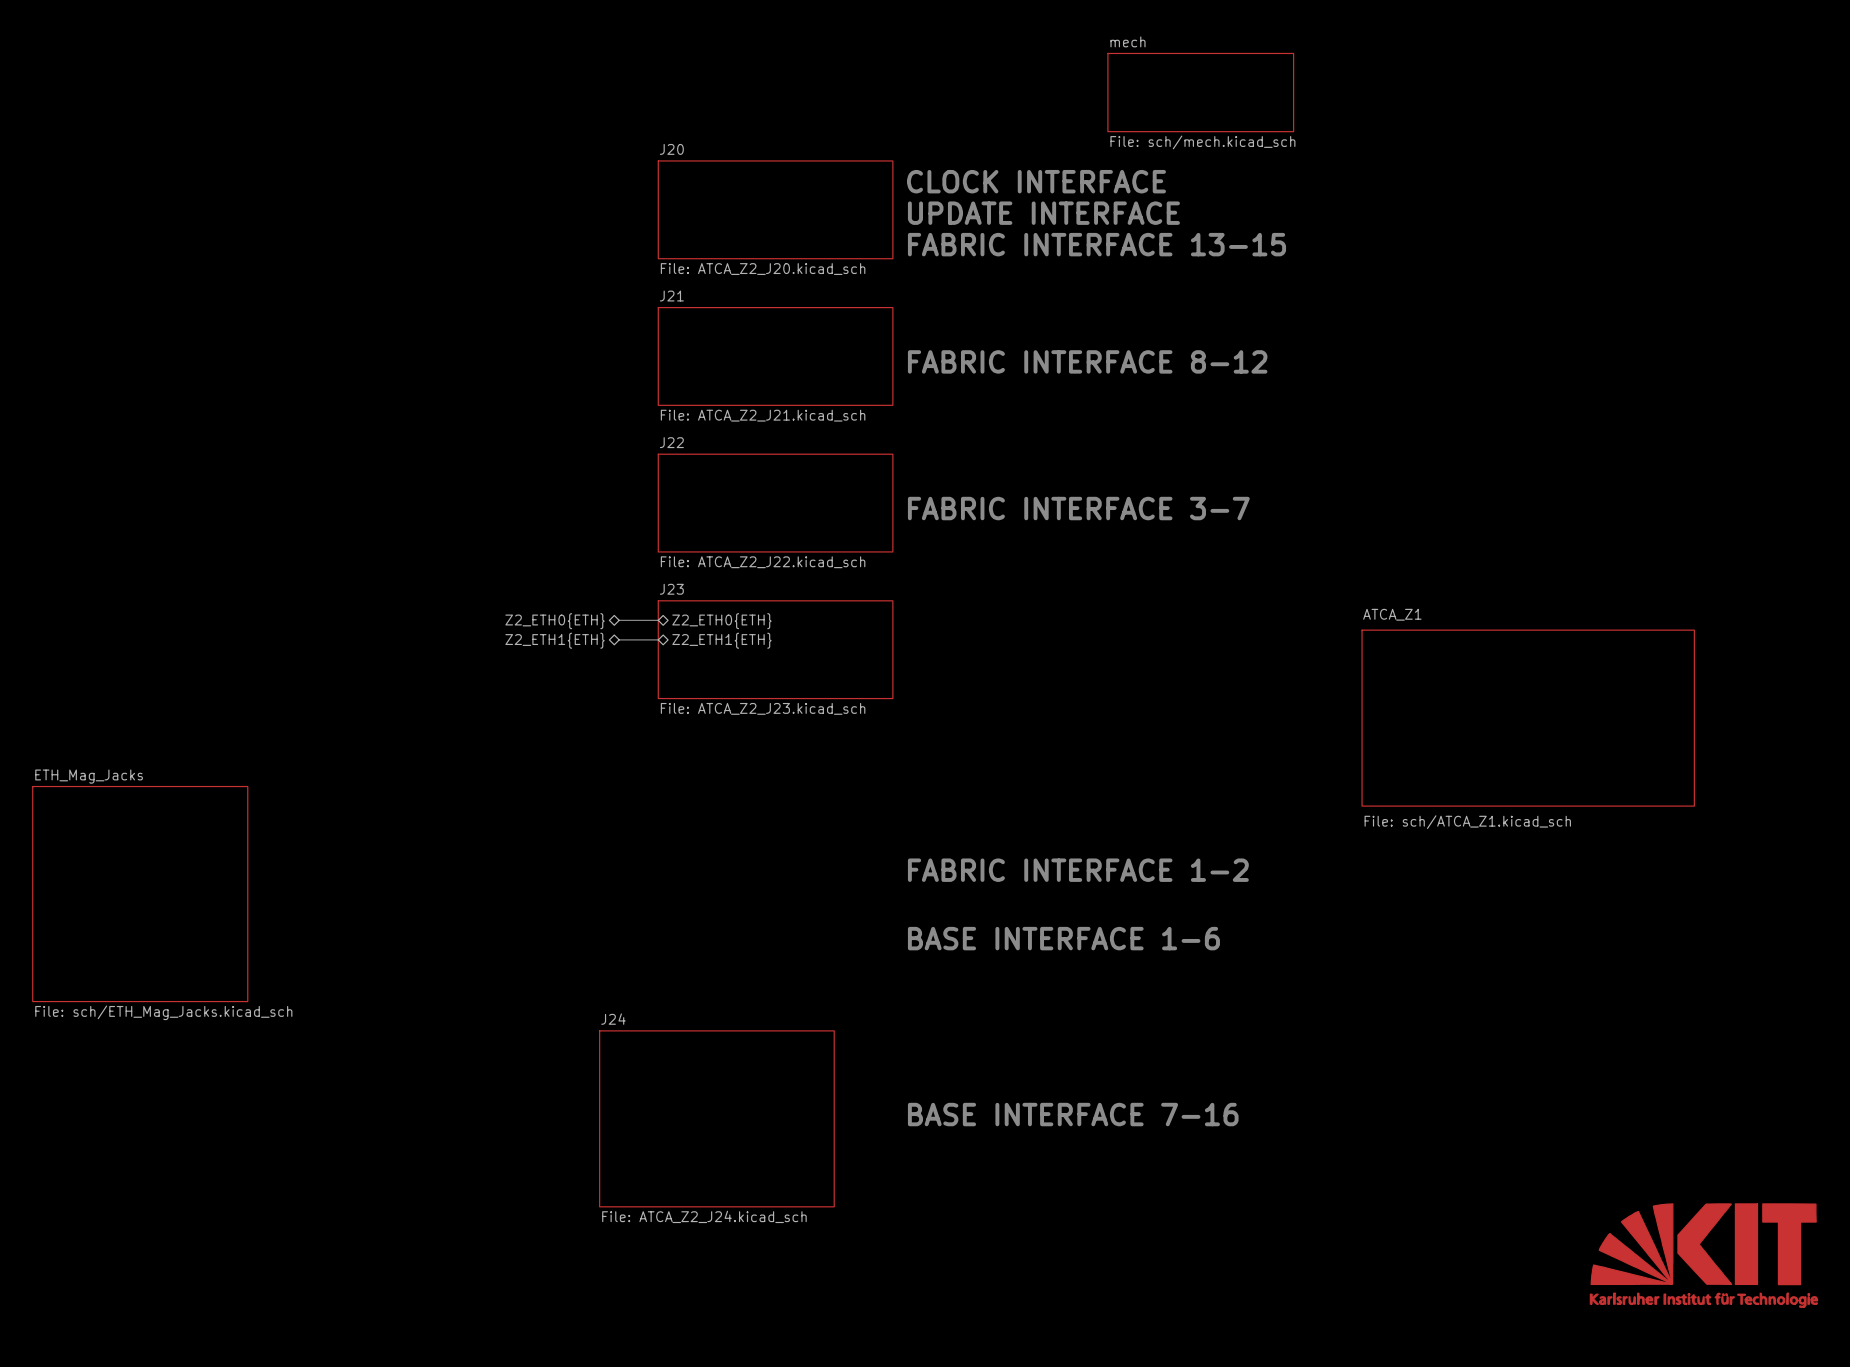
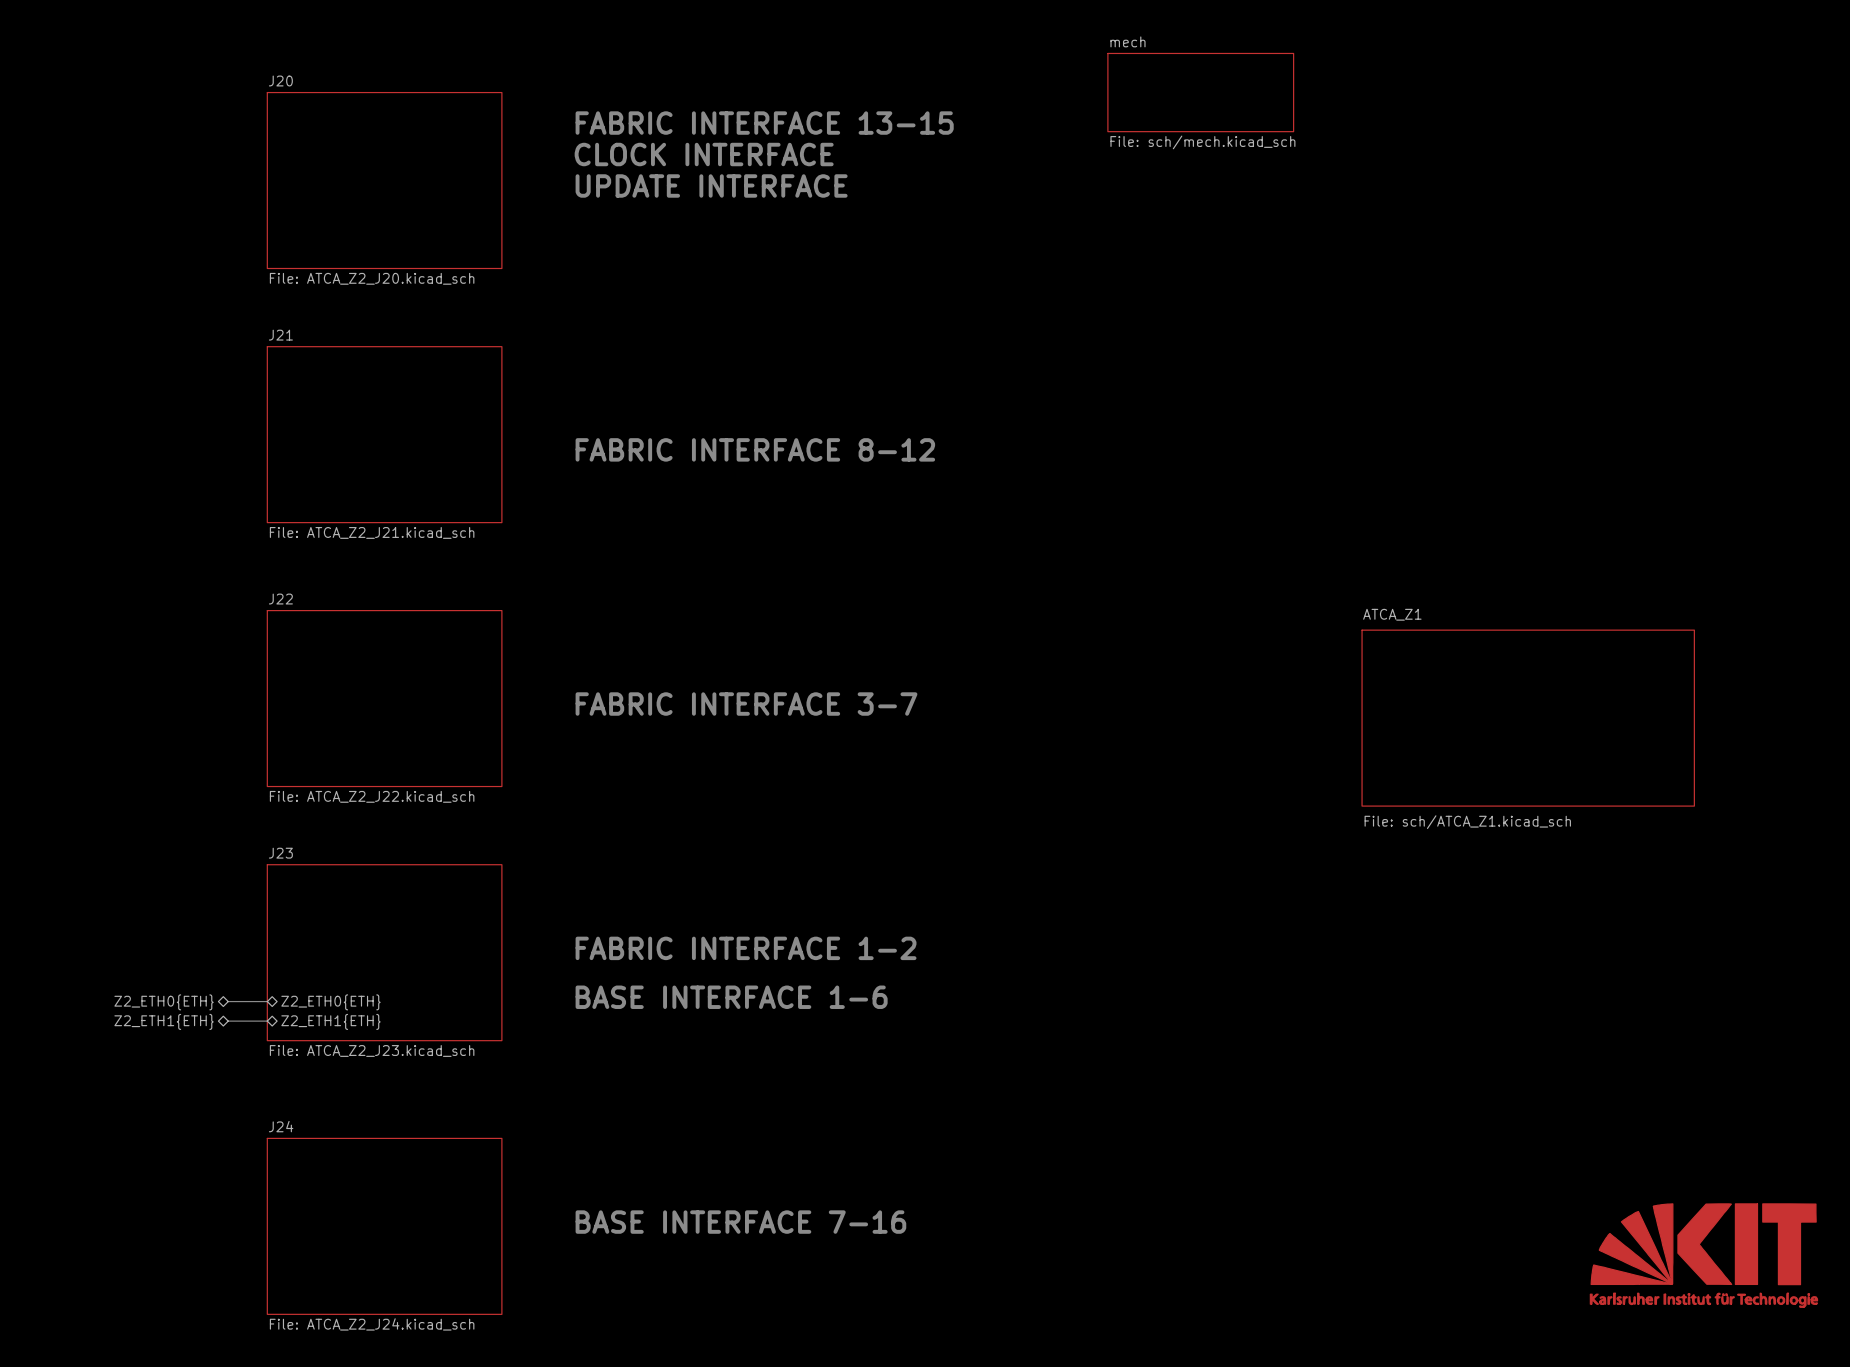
text: none -> FABRIC INTERFACE 13-15 (764, 123)
sheet J20 name position: J20 (671, 149) -> J20 (280, 80)
text: none -> CLOCK INTERFACE (704, 154)
sheet J20 shape: [657, 160, 894, 260] -> [266, 91, 503, 270]
text: CLOCK INTERFACE (1036, 181) -> none
text: none -> UPDATE INTERFACE (711, 185)
text: UPDATE INTERFACE (1043, 213) -> none
text: FABRIC INTERFACE 13-15 (1096, 244) -> none
sheet J20 value position: File: ATCA_Z2_J20.kicad_sch (763, 269) -> File: ATCA_Z2_J20.kicad_sch (372, 278)
sheet J21 name position: J21 (671, 296) -> J21 (280, 335)
sheet J21 shape: [657, 307, 894, 406] -> [266, 346, 503, 524]
text: FABRIC INTERFACE 8-12 (1087, 361) -> none
sheet J21 value position: File: ATCA_Z2_J21.kicad_sch (763, 415) -> File: ATCA_Z2_J21.kicad_sch (372, 532)
sheet J22 name position: J22 (671, 442) -> J22 (280, 599)
text: none -> FABRIC INTERFACE 8-12 (755, 449)
sheet J22 shape: [657, 453, 894, 553] -> [266, 610, 503, 788]
text: FABRIC INTERFACE 3-7 (1078, 508) -> none
sheet J22 value position: File: ATCA_Z2_J22.kicad_sch (763, 562) -> File: ATCA_Z2_J22.kicad_sch (372, 796)
sheet J23 name position: J23 (671, 589) -> J23 (280, 853)
sheet J23 shape: [657, 600, 894, 700] -> [266, 864, 503, 1042]
bus: (619, 620) (658, 620) -> none
hierarchical label: Z2_ETH0{ETH} (555, 621) -> none
sheet pin: Z2_ETH0{ETH} (721, 621) -> none
bus: (619, 639) (658, 639) -> none
hierarchical label: Z2_ETH1{ETH} (555, 640) -> none
sheet pin: Z2_ETH1{ETH} (721, 640) -> none
text: none -> FABRIC INTERFACE 3-7 (746, 704)
sheet J23 value position: File: ATCA_Z2_J23.kicad_sch (763, 708) -> File: ATCA_Z2_J23.kicad_sch (372, 1050)
text: FABRIC INTERFACE 1-2 (1078, 870) -> none
sheet ETH_Mag_Jacks: File: sch/ETH_Mag_Jacks.kicad_sch (140, 894) -> none
text: BASE INTERFACE 1-6 (1063, 938) -> none
text: none -> FABRIC INTERFACE 1-2 (746, 948)
text: none -> BASE INTERFACE 1-6 (731, 997)
bus: none -> (228, 1001) (267, 1001)
hierarchical label: none -> Z2_ETH0{ETH} (164, 1002)
sheet pin: none -> Z2_ETH0{ETH} (331, 1002)
hierarchical label: none -> Z2_ETH1{ETH} (164, 1021)
bus: none -> (228, 1021) (267, 1021)
sheet pin: none -> Z2_ETH1{ETH} (331, 1021)
text: BASE INTERFACE 7-16 (1073, 1114) -> none
sheet J24 position: (716, 1118) -> (384, 1226)
text: none -> BASE INTERFACE 7-16 (740, 1222)

